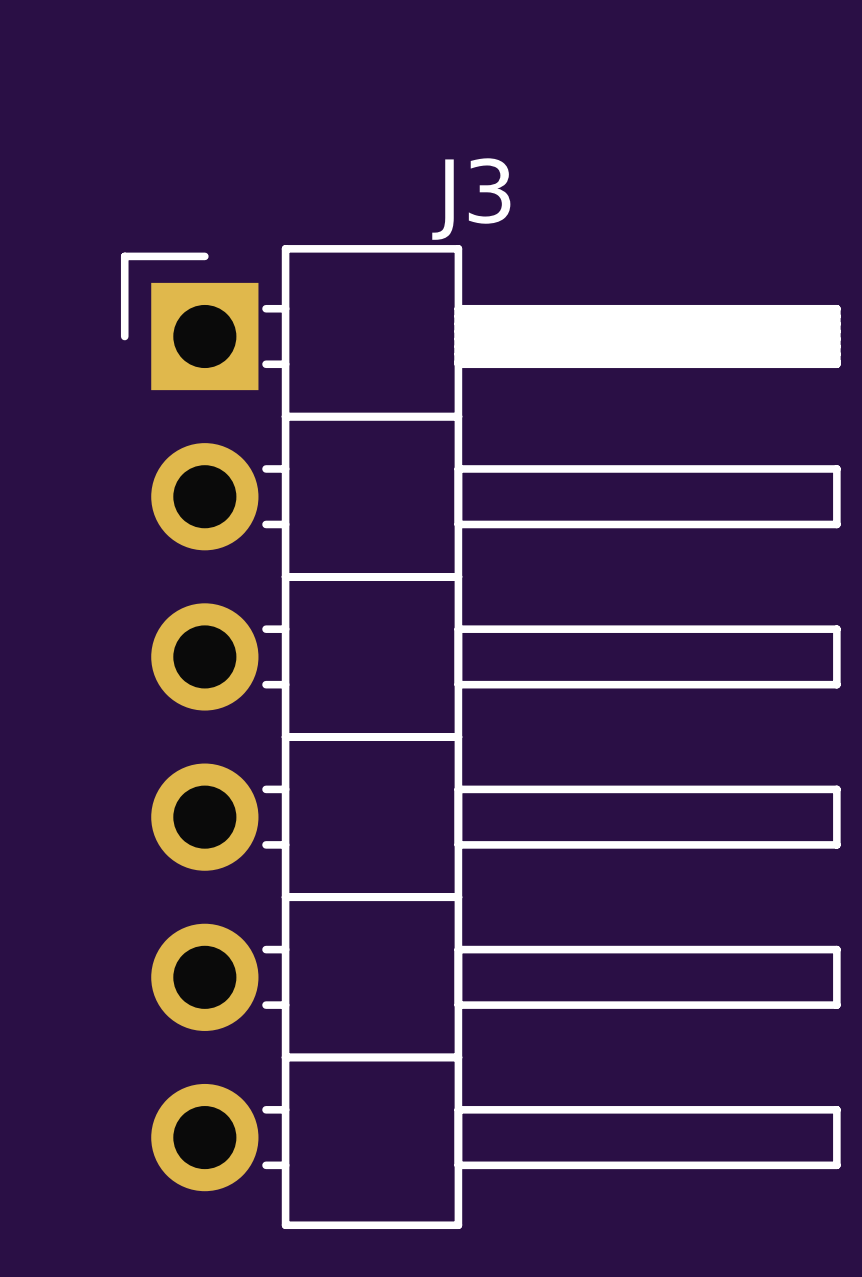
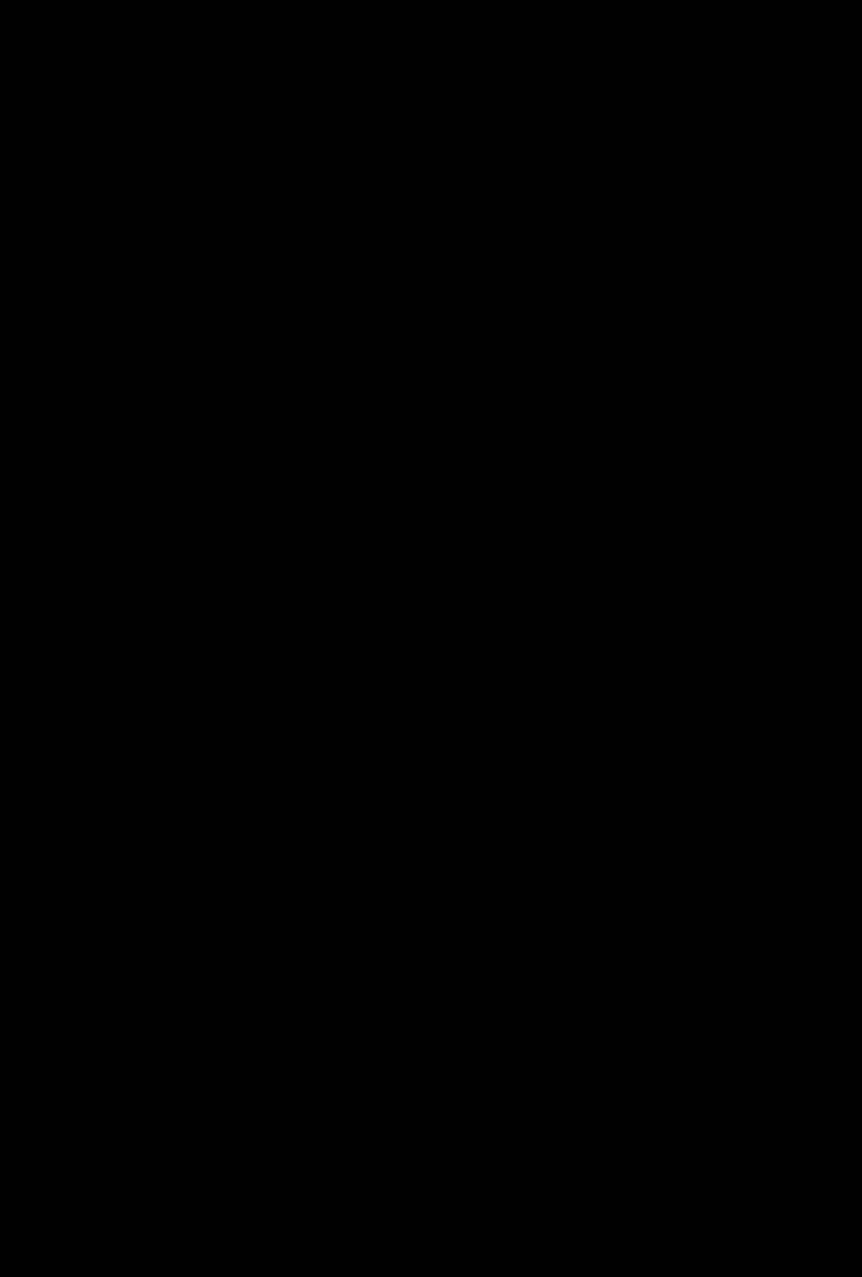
J3: (480, 737) -> none

